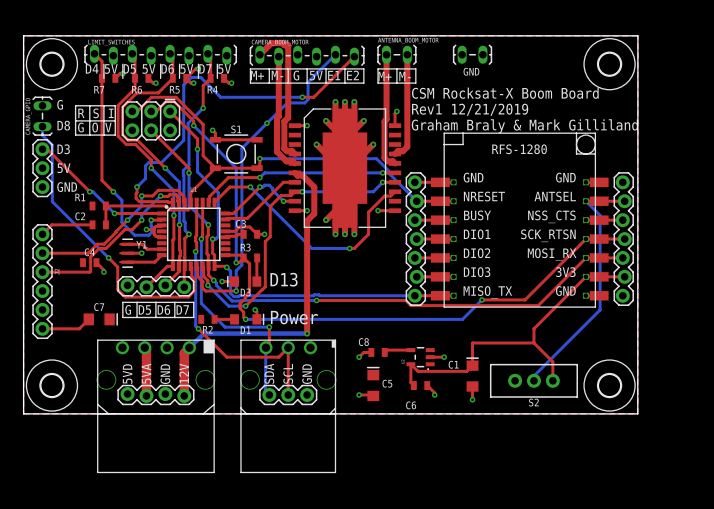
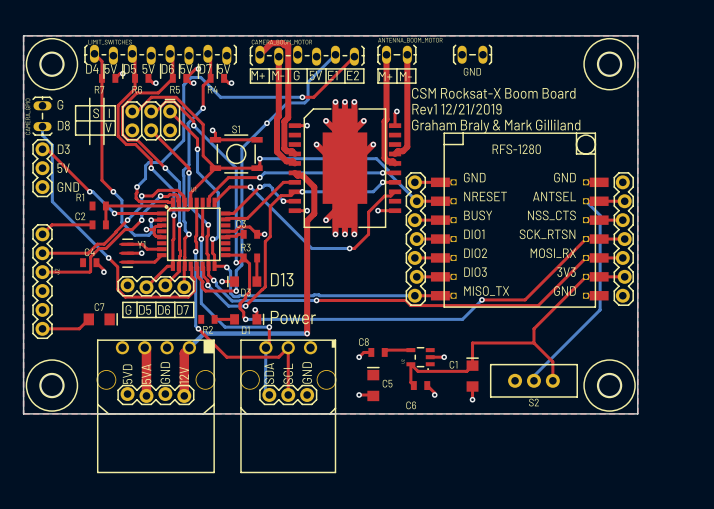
line: none -> (89, 98) (89, 105)
line: none -> (103, 98) (103, 105)
text: R (81, 113) -> none
text: G (80, 127) -> none
text: O (95, 127) -> none
line: none -> (89, 135) (89, 144)
line: none -> (103, 135) (103, 144)

